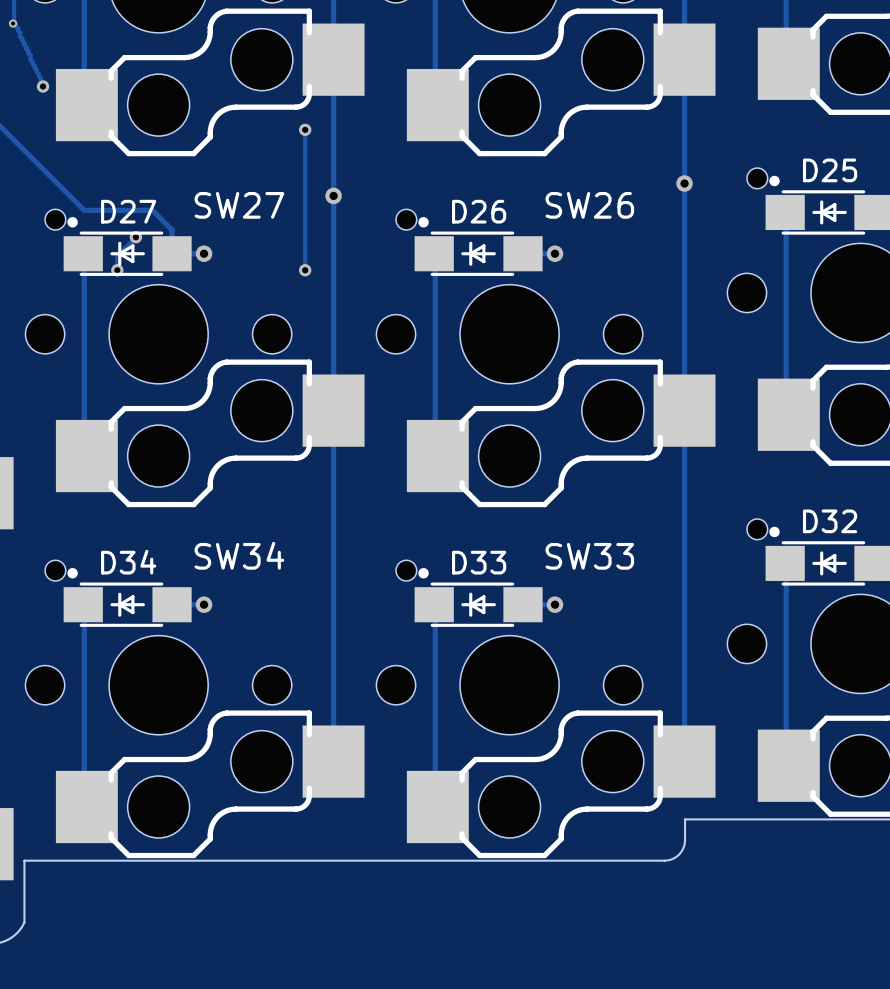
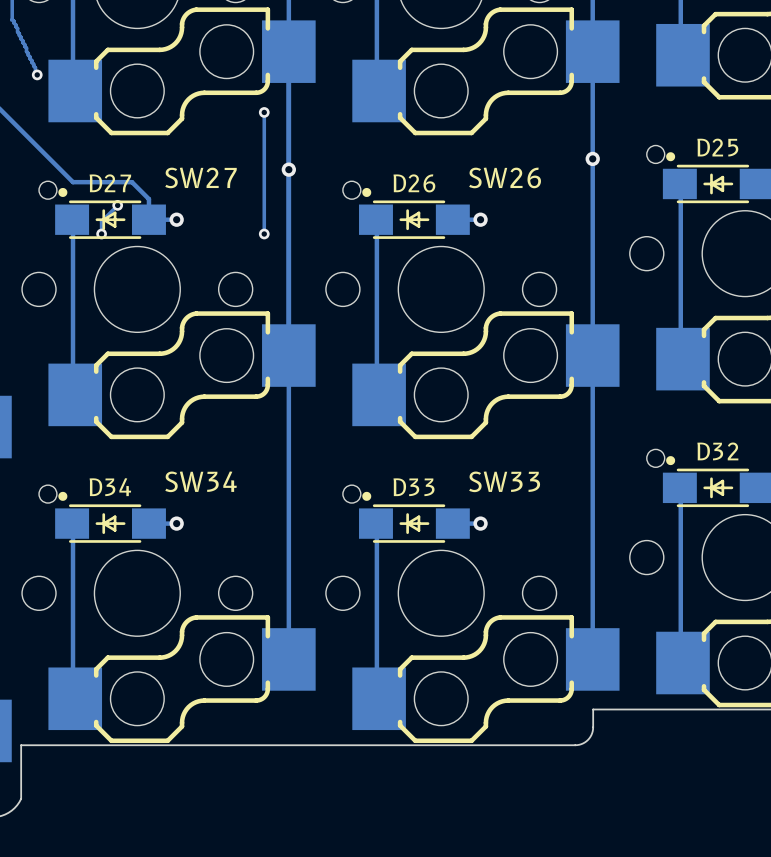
via: (13, 23) -> none

